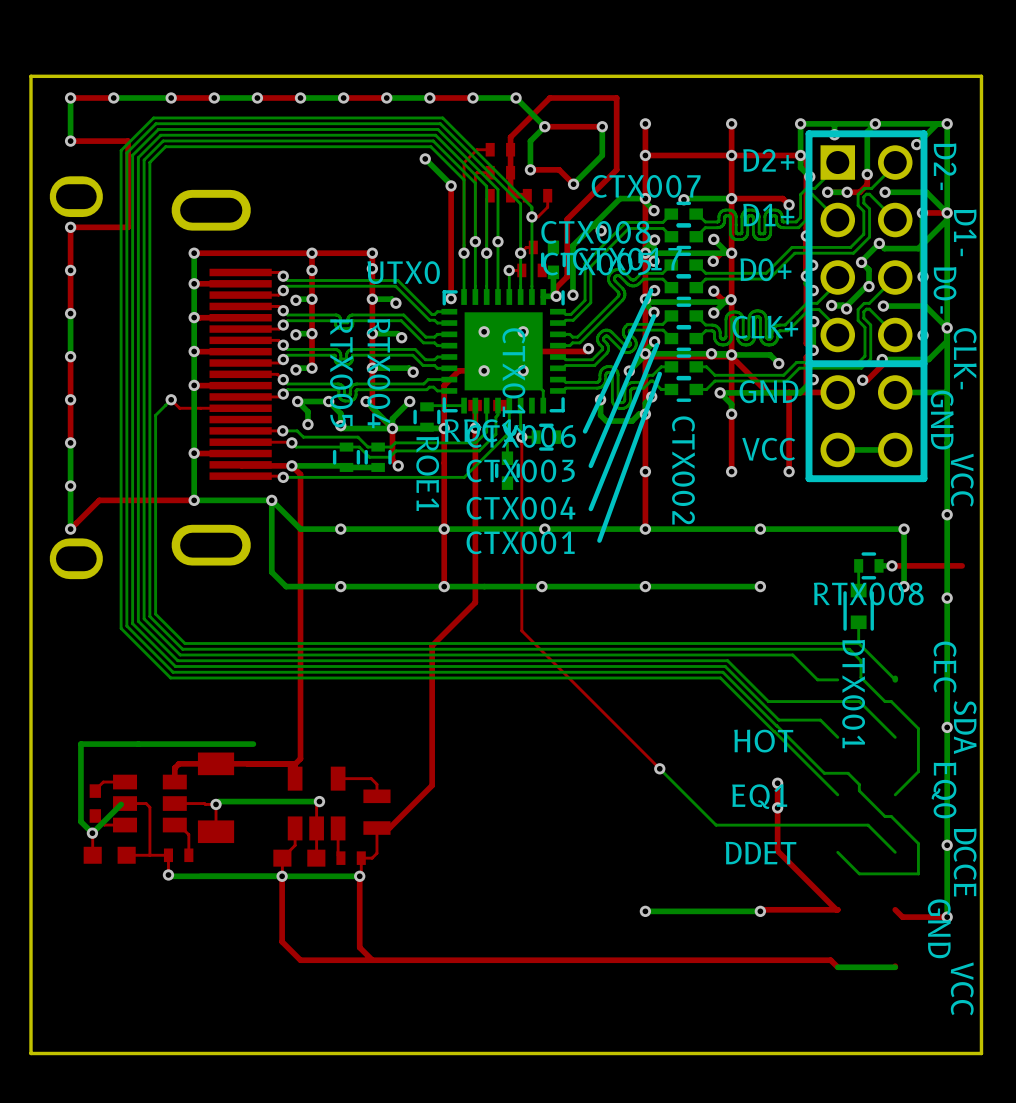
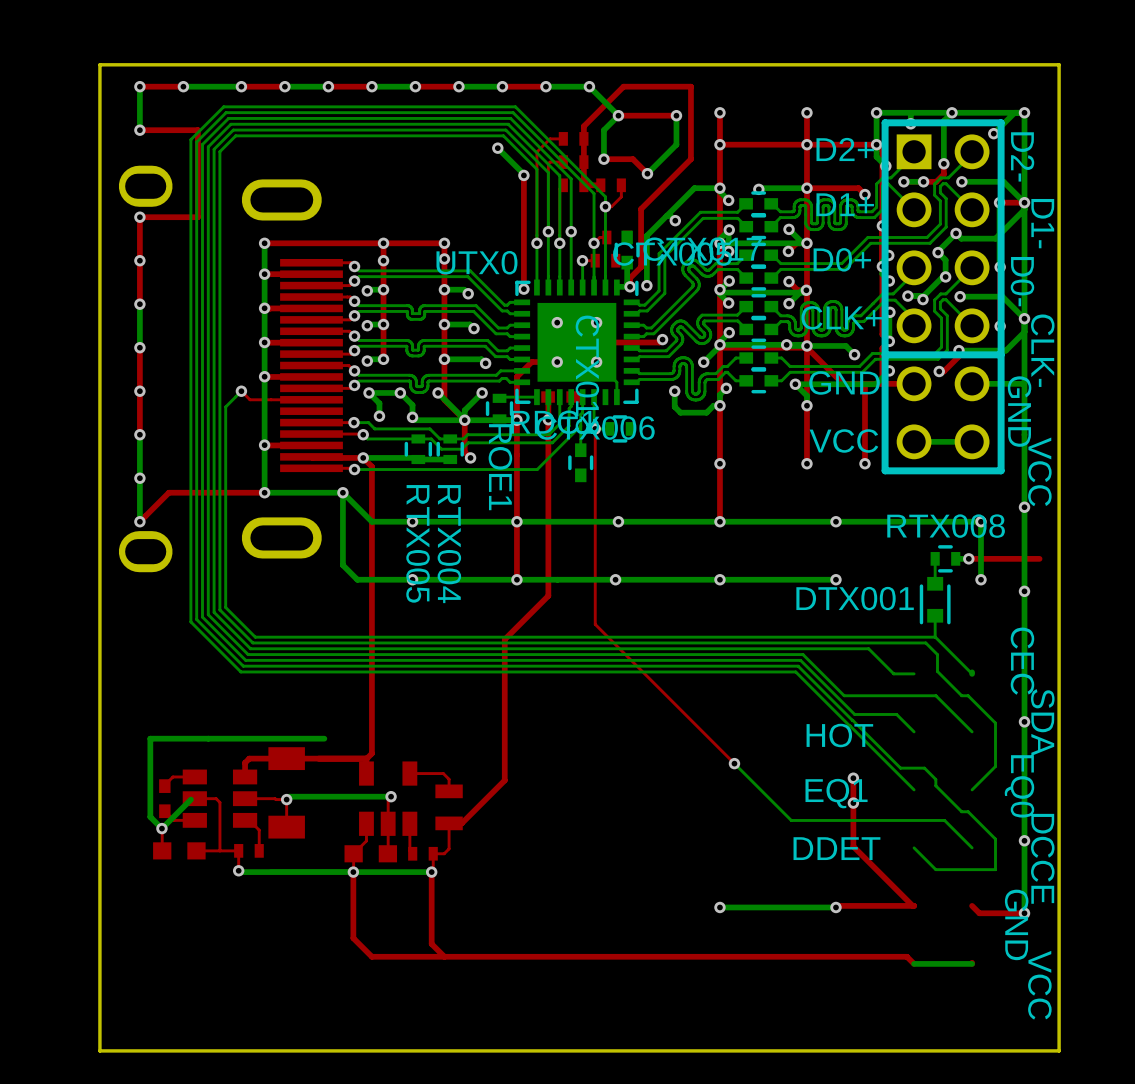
CTX007 name: CTX007 (646, 186) -> none
CTX008 name: CTX008 (595, 232) -> none
line: (651, 290) (585, 431) -> none
line: (654, 316) (590, 465) -> none
line: (656, 345) (590, 508) -> none
RTX005 name position: RTX005 (341, 373) -> RTX005 (418, 543)
RTX004 name position: RTX004 (378, 373) -> RTX004 (449, 544)
line: (659, 373) (599, 540) -> none
CTX003 name: CTX003 (520, 470) -> none
CTX002 name: CTX002 (683, 470) -> none
CTX004 name: CTX004 (521, 508) -> none
CTX001 name: CTX001 (520, 542) -> none
RTX008 name position: RTX008 (868, 593) -> RTX008 (946, 526)
DTX001 name rotation: 0° (853, 694) -> 90° counterclockwise (855, 598)

